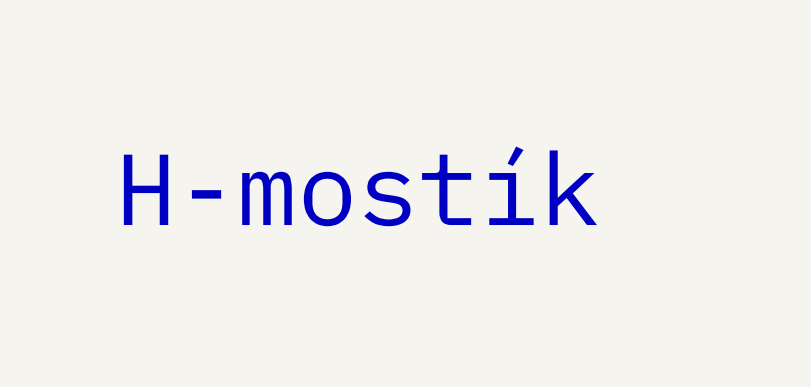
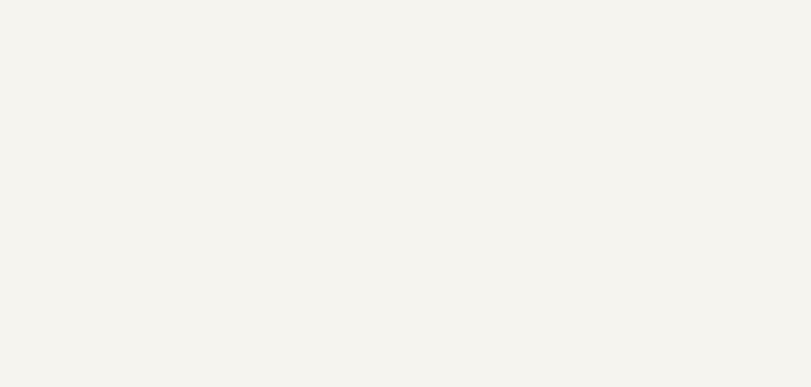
text: H-mostík (360, 186) -> none

